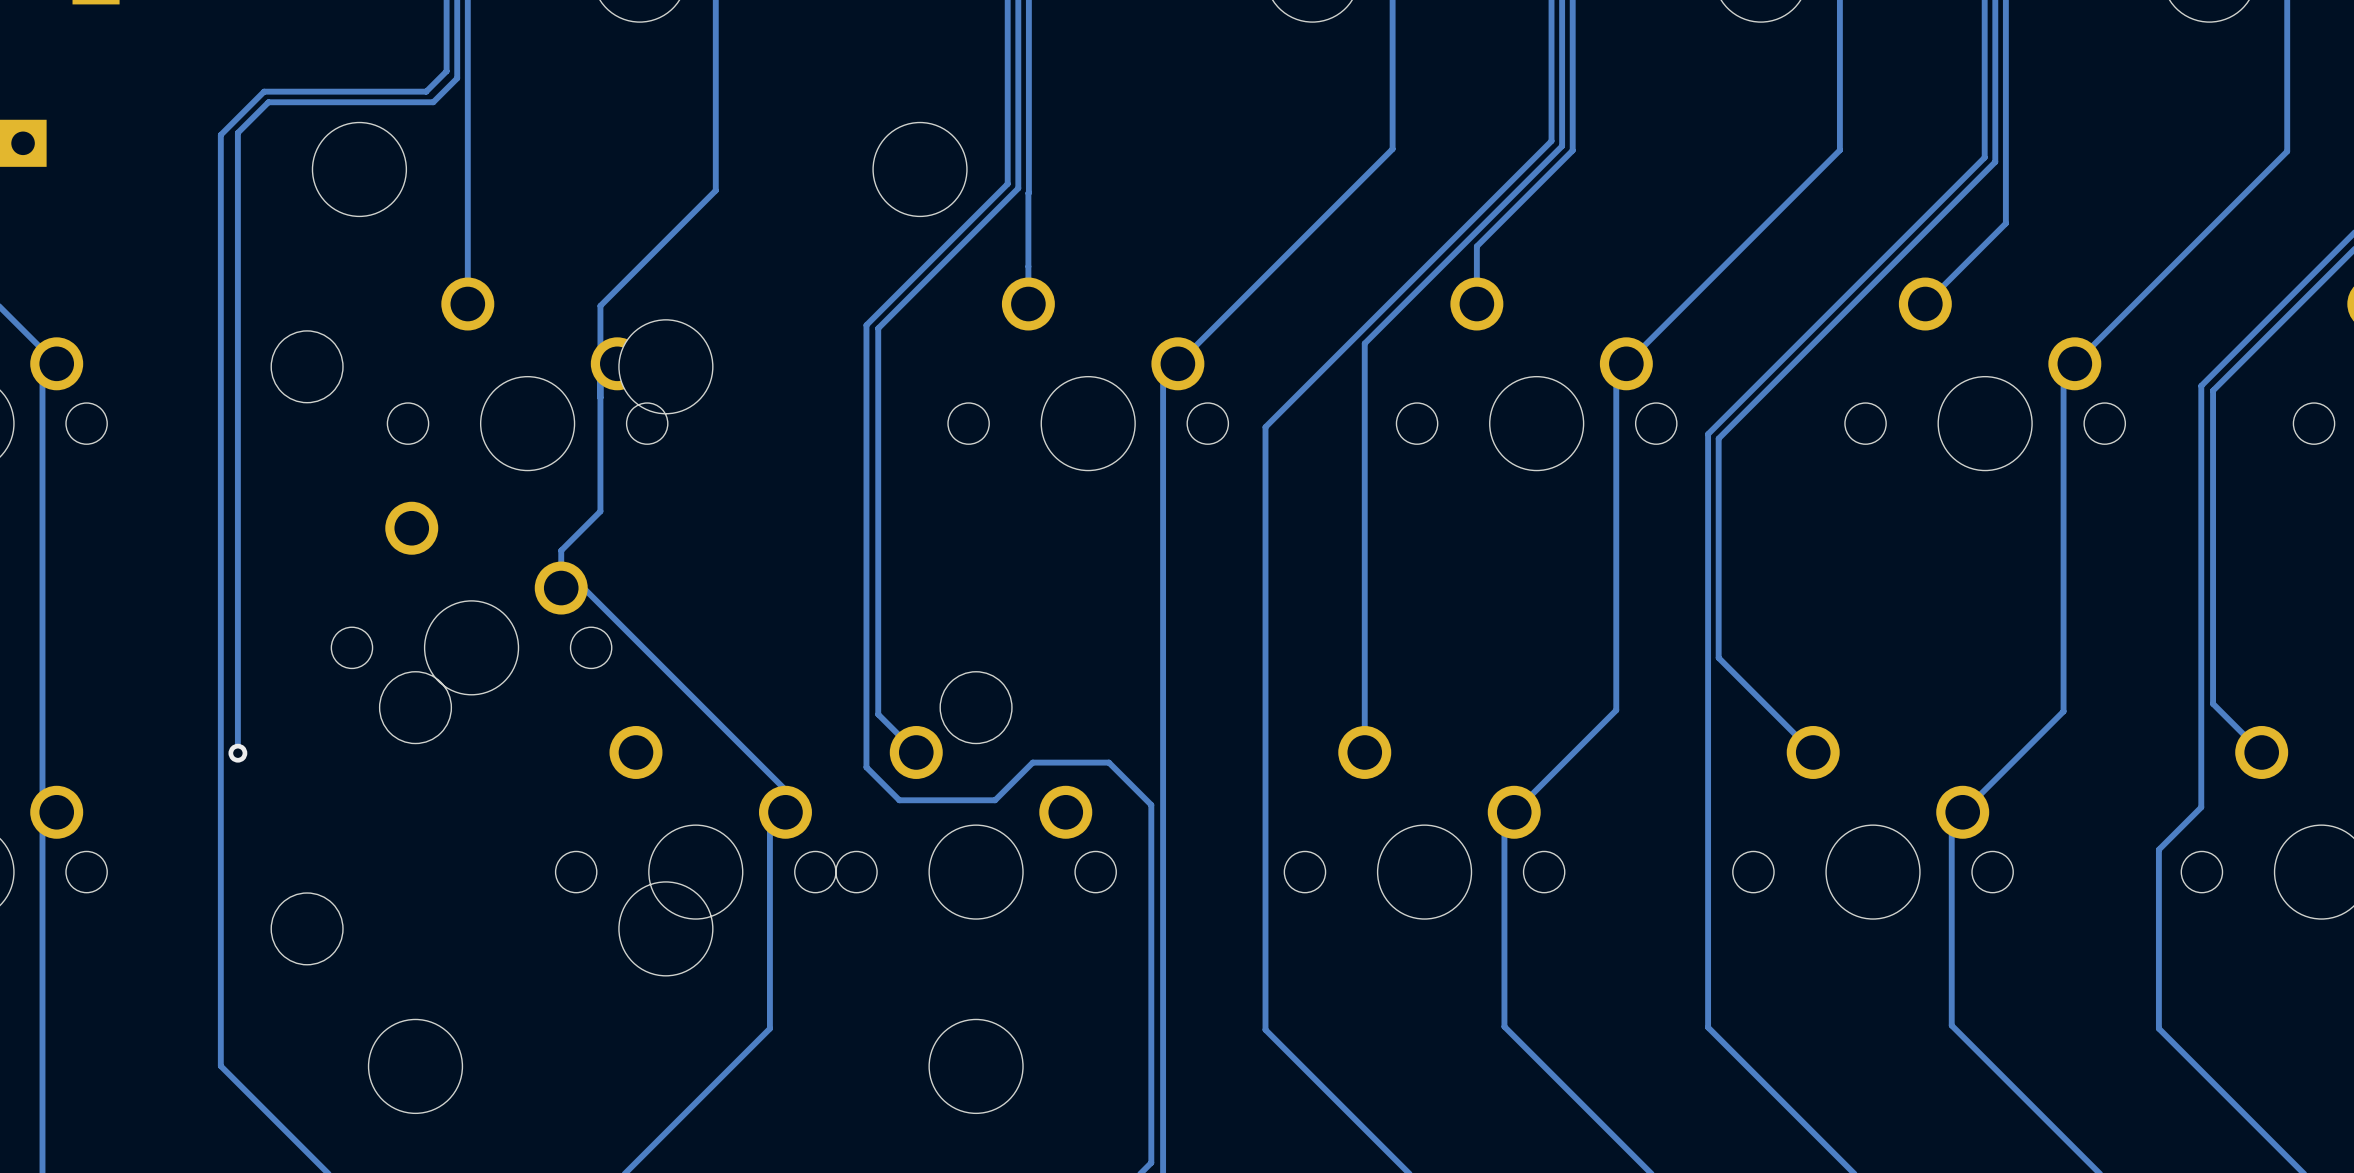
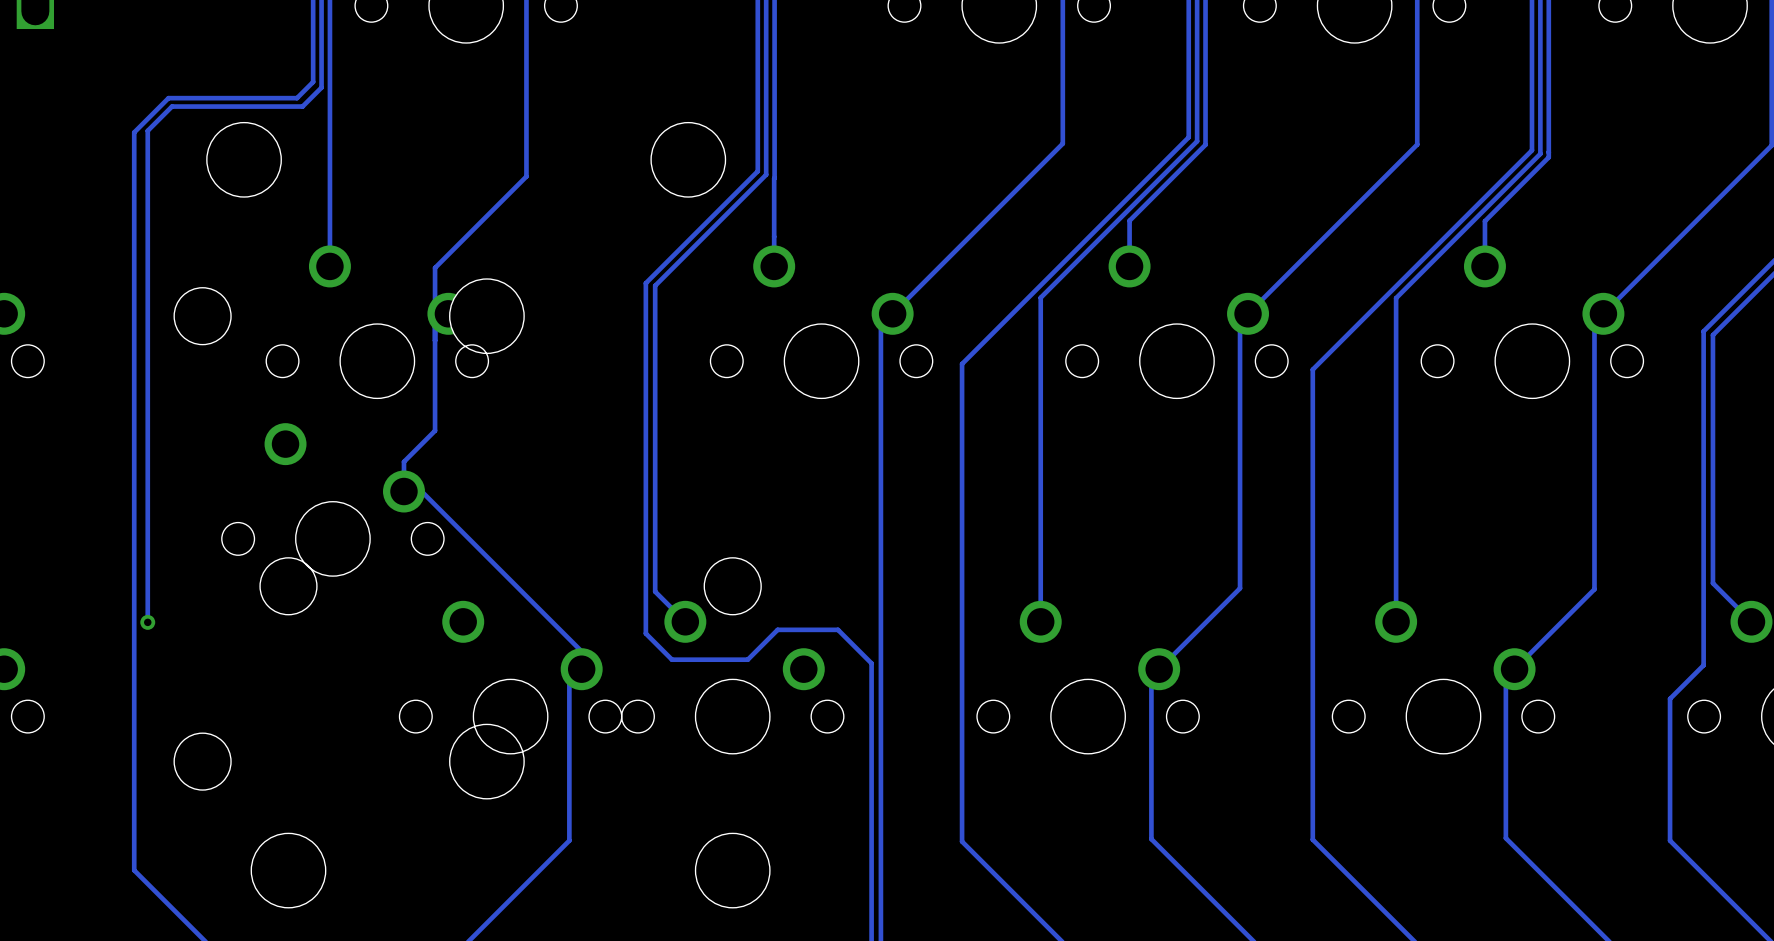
track: (2005, 166) (2005, 223) (1925, 304) -> (1548, 157) (1484, 221) (1484, 266)
track: (1813, 344) (1718, 438) (1718, 657) (1813, 752) -> (1396, 298) (1396, 621)

